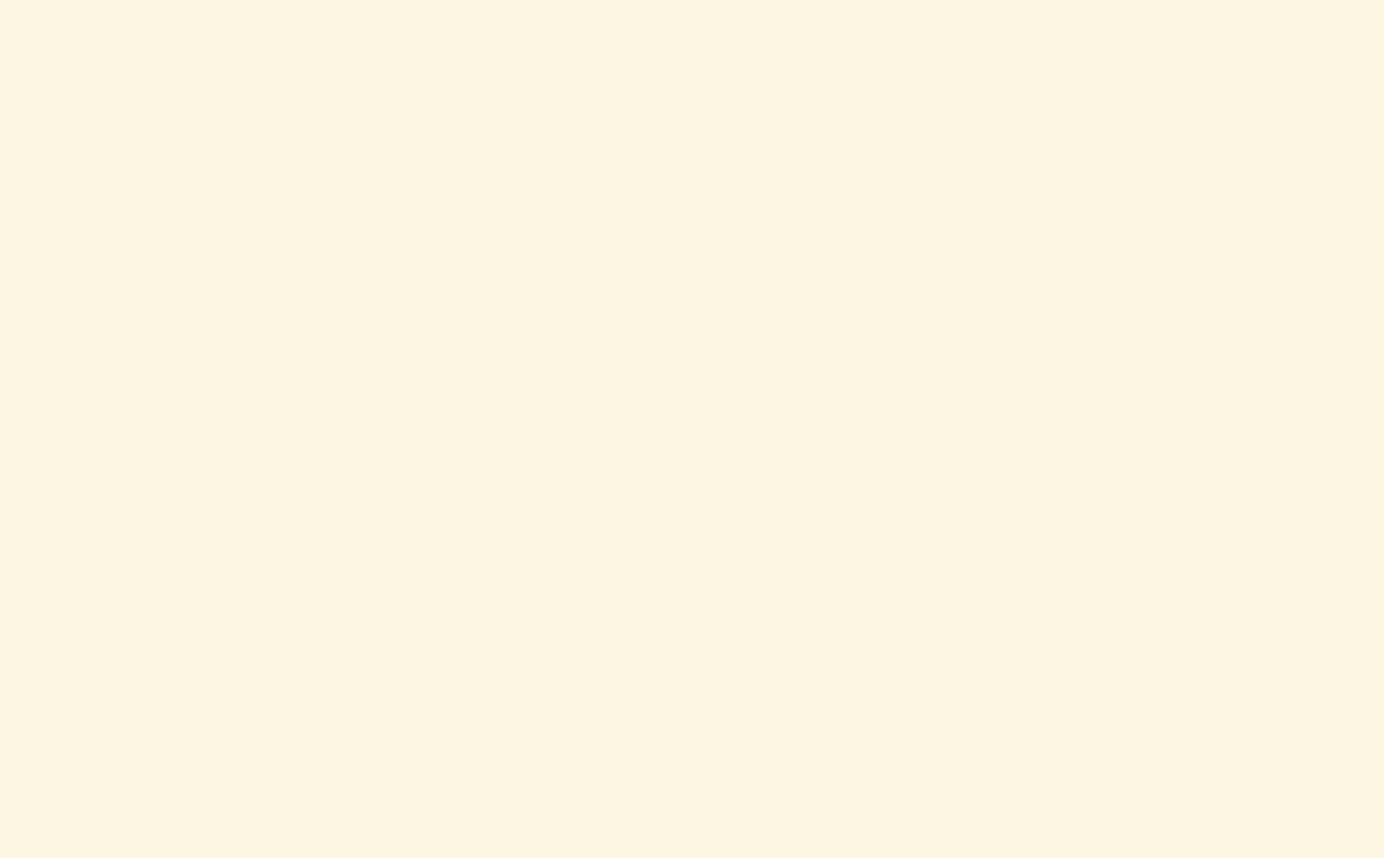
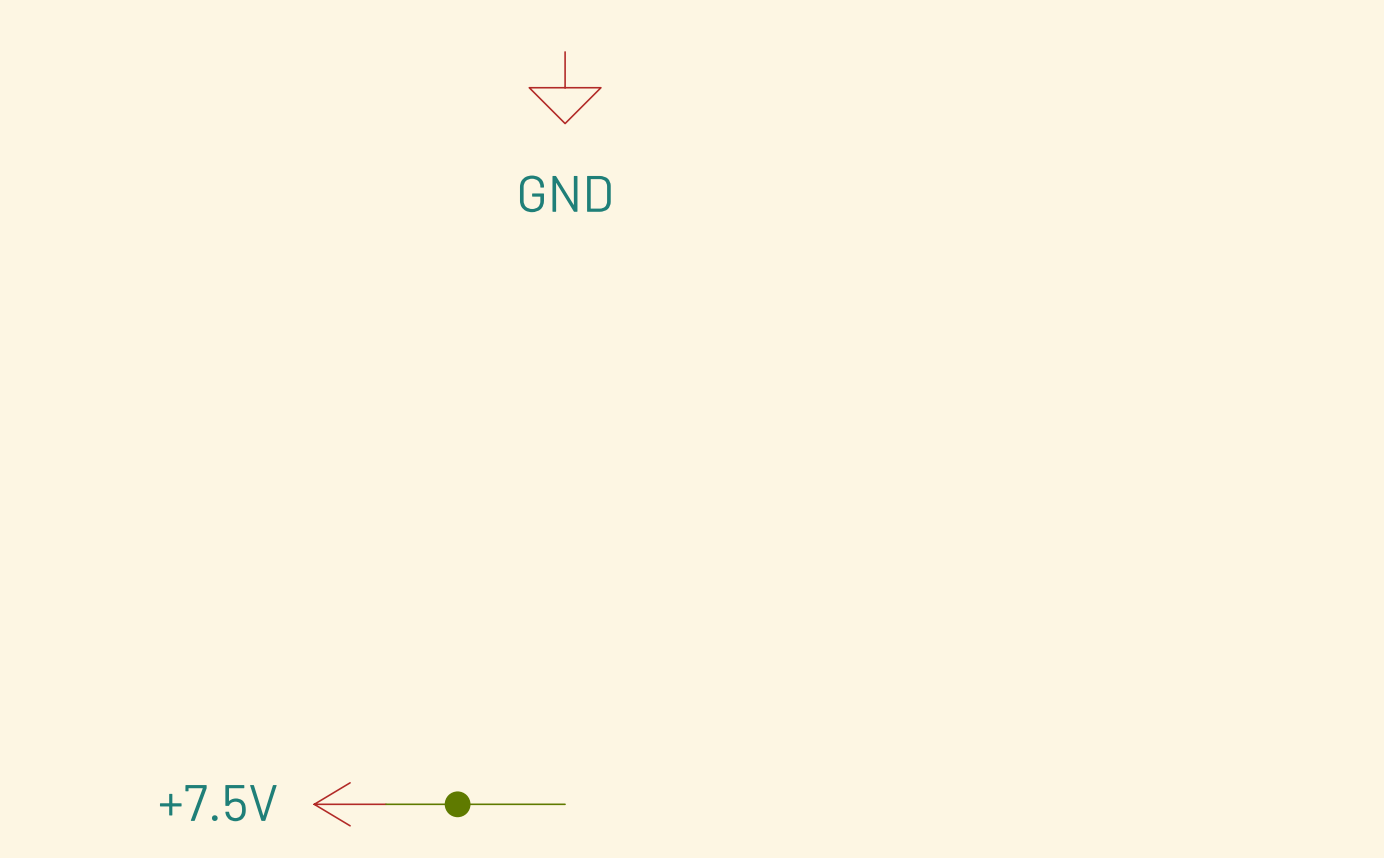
power symbol: none -> GND (565, 87)
power symbol: none -> +7.5V (350, 804)
wire: none -> (385, 804) (565, 804)
junction: none -> (457, 804)

